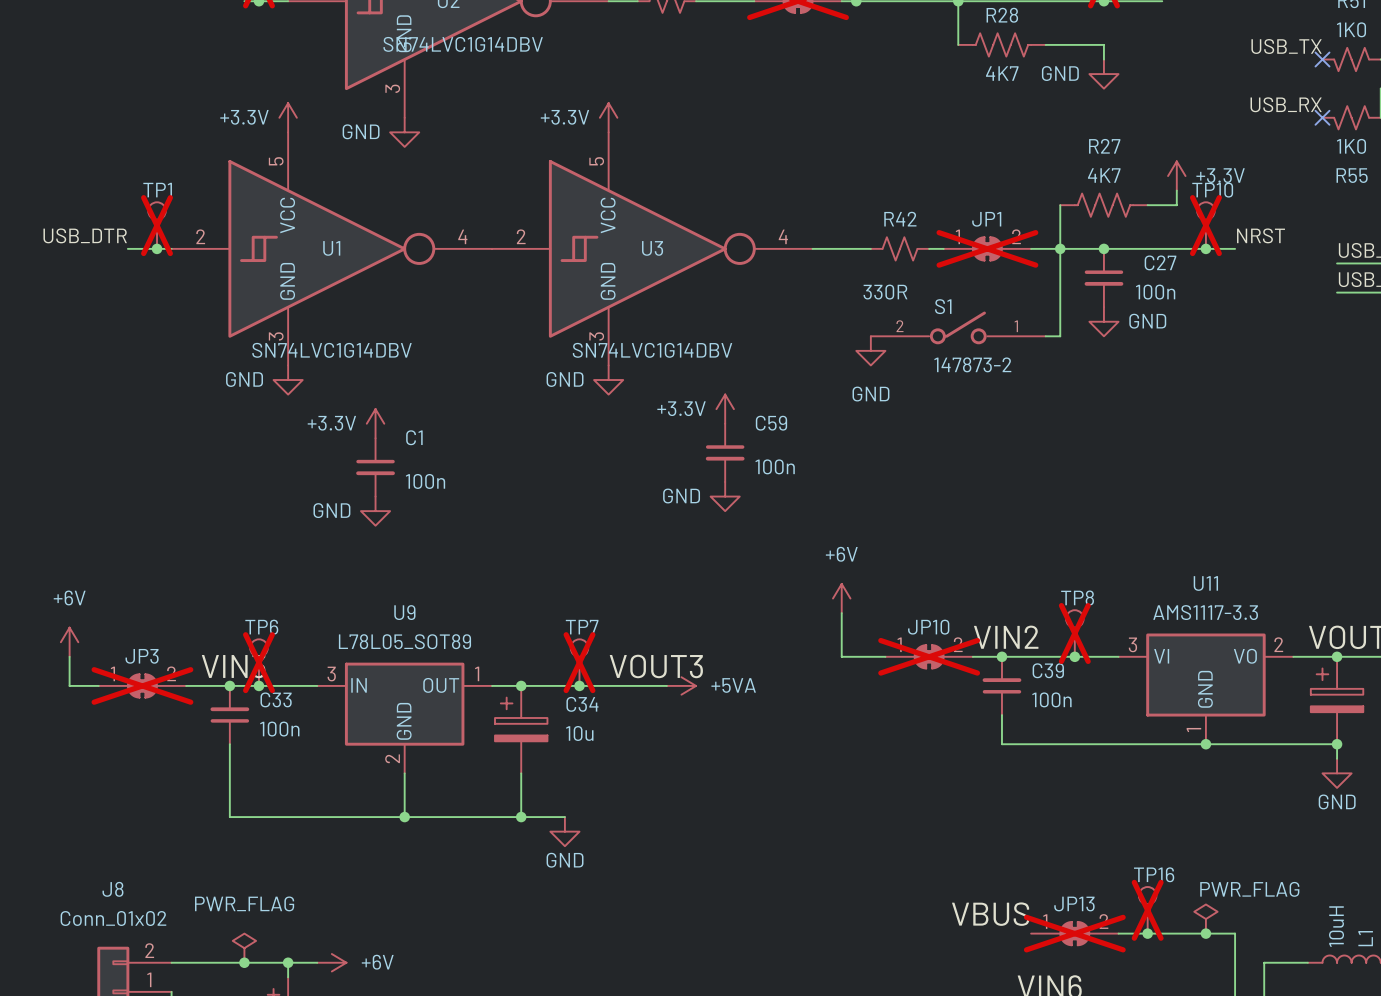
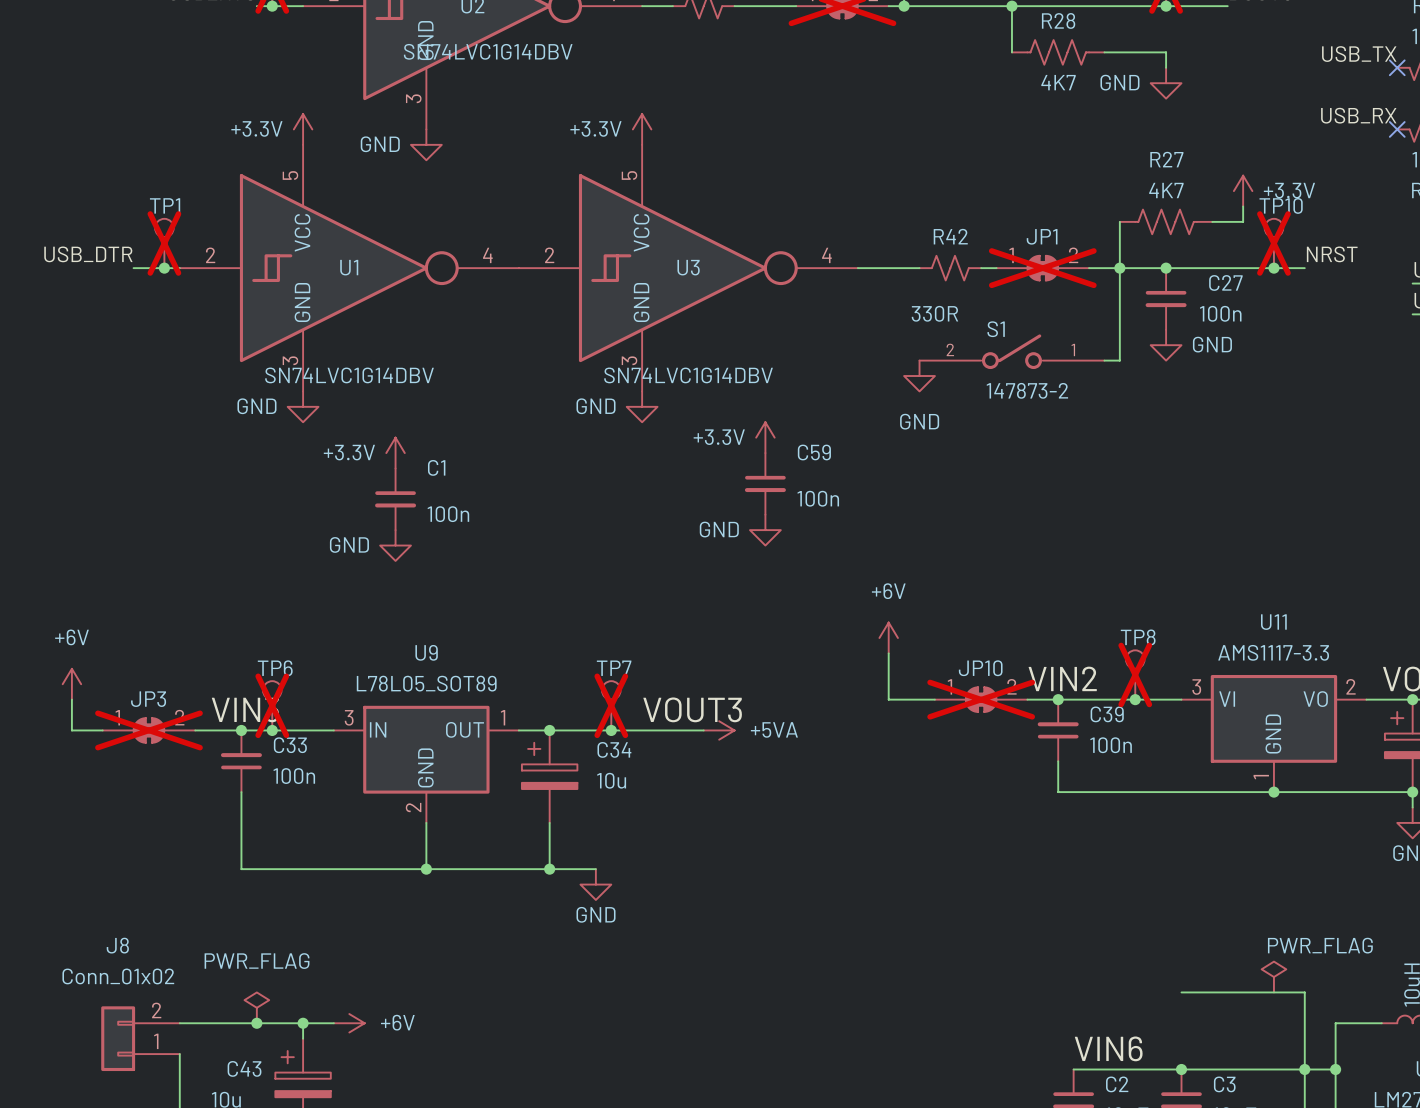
TP16: (1147, 910) -> none
label: VBUS (990, 914) -> none
JP13: (1074, 933) -> none
junction: (1147, 933) -> none
junction: (1205, 933) -> none

